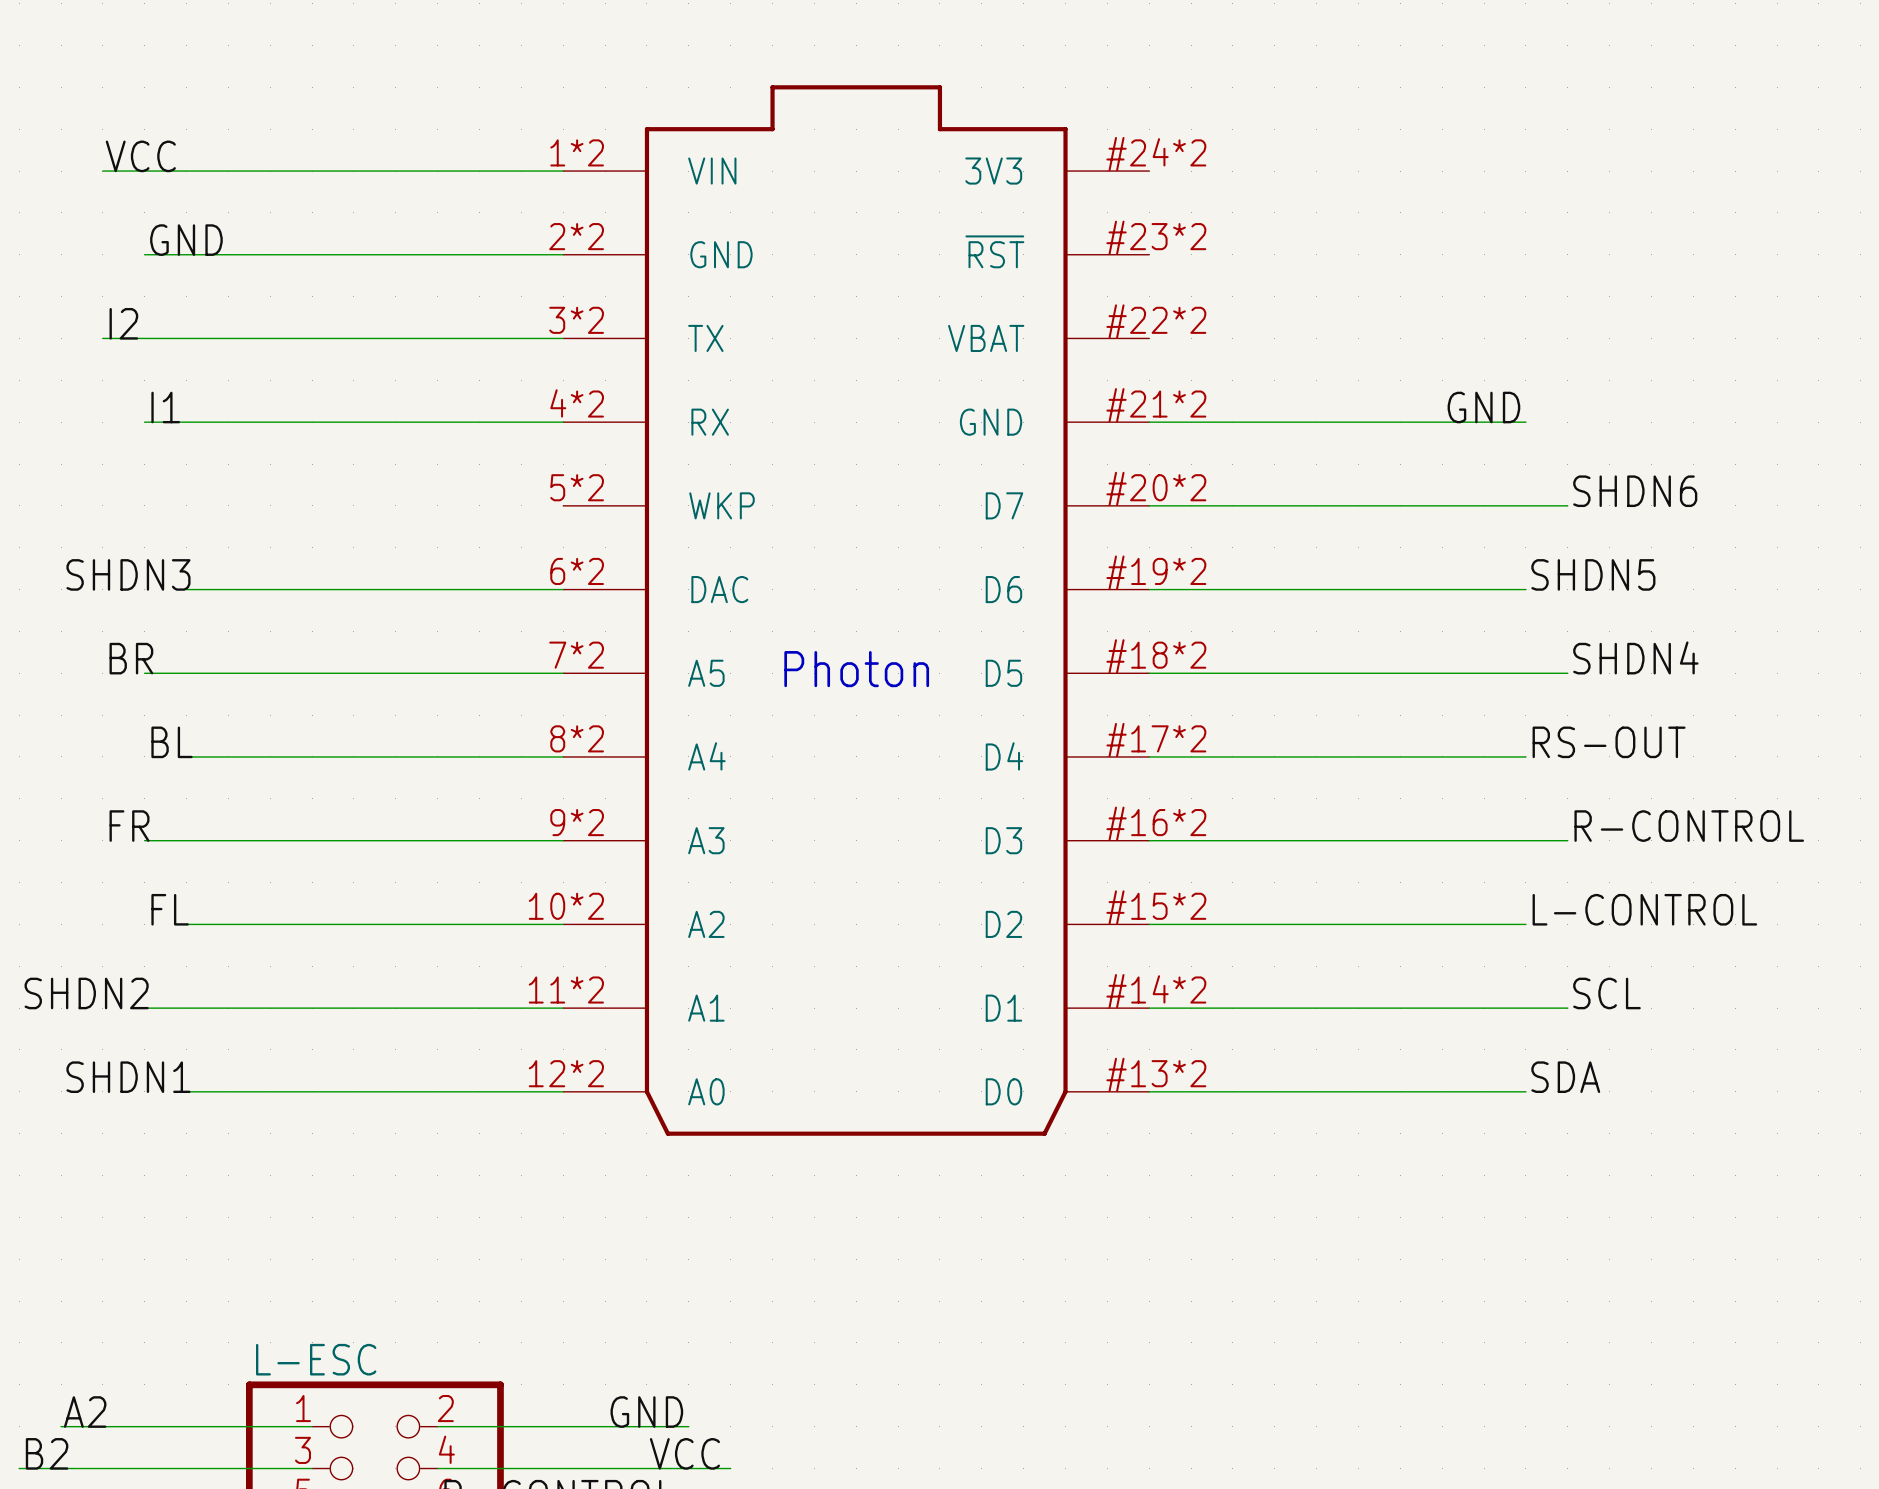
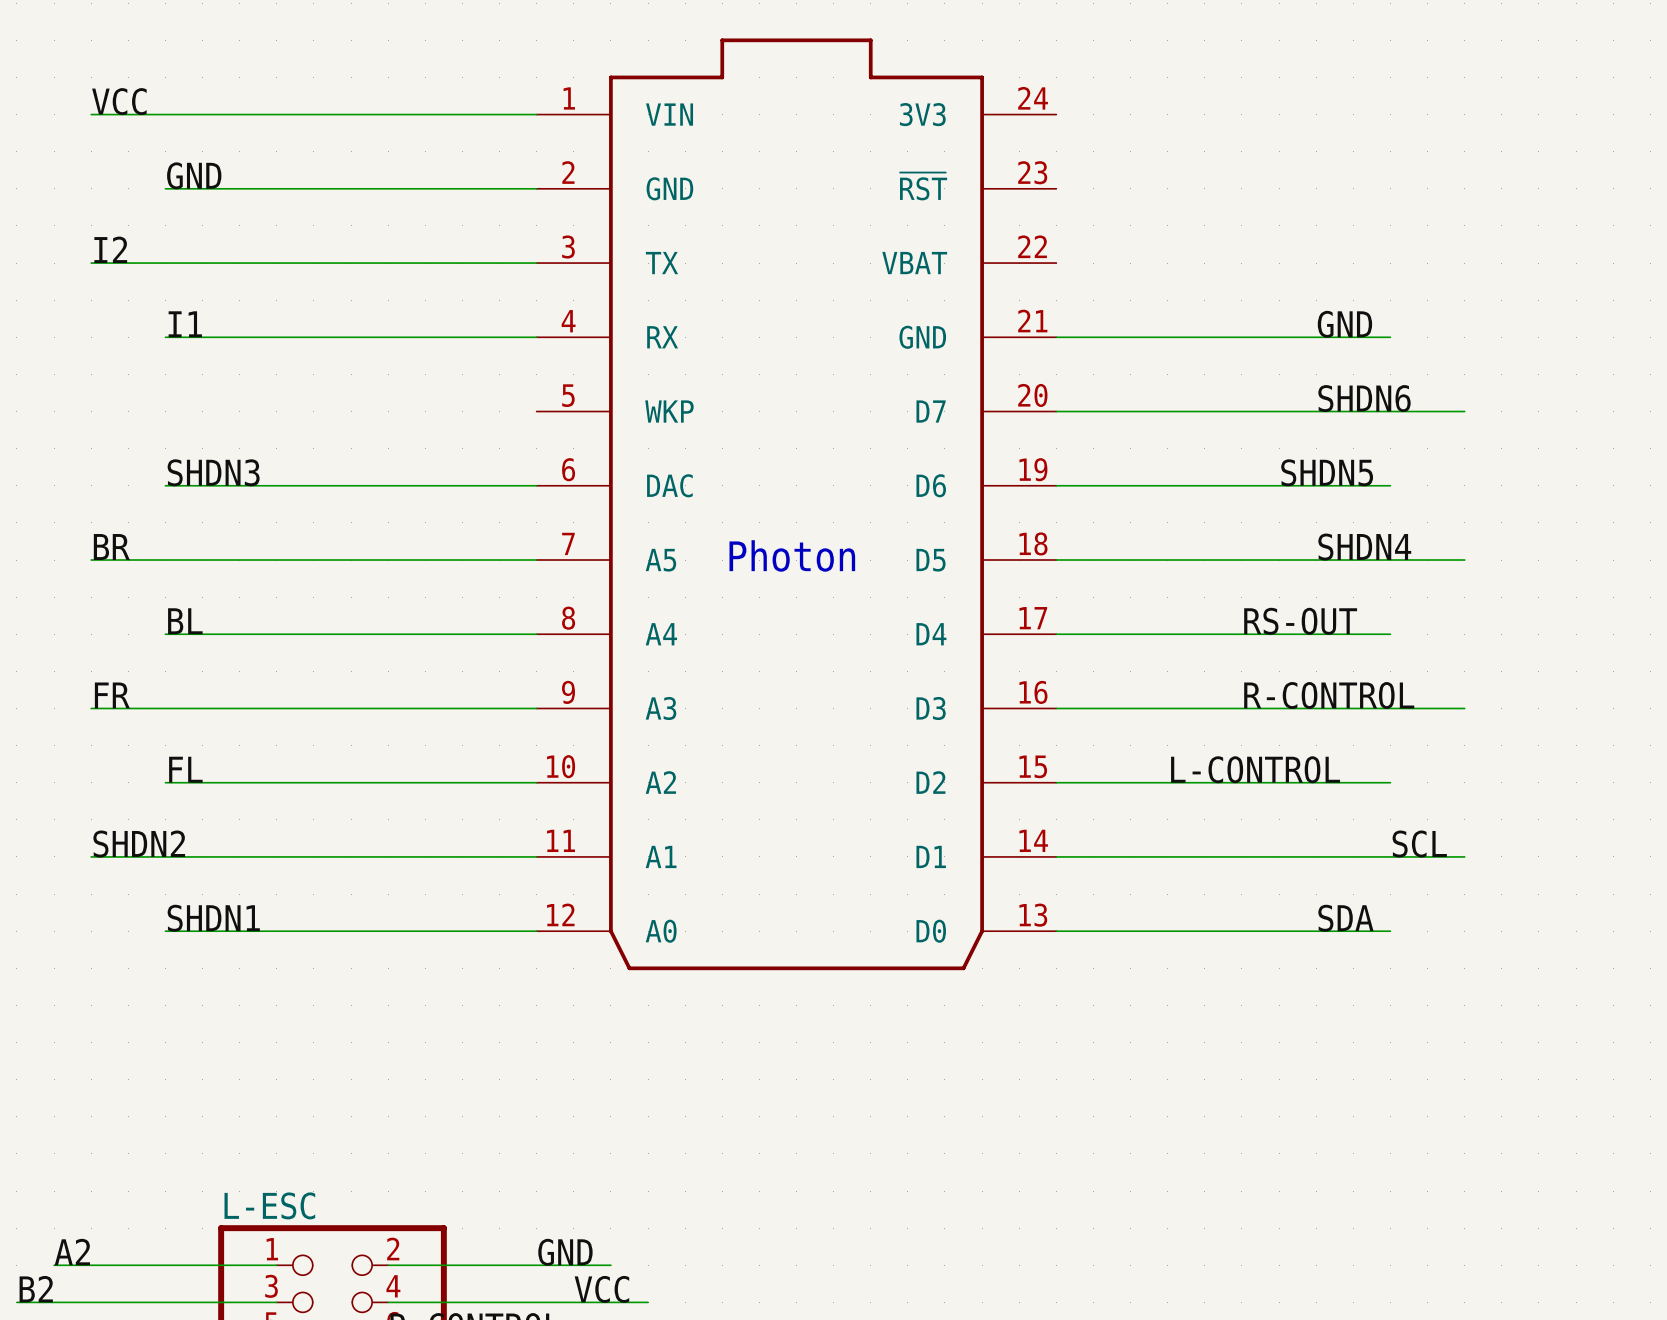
wire: none -> (91, 114) (536, 114)
label position: VCC (140, 156) -> VCC (119, 101)
wire: (102, 171) (563, 171) -> none
label position: GND (186, 240) -> GND (194, 175)
wire: (144, 254) (563, 254) -> (165, 188) (536, 188)
wire: none -> (91, 263) (536, 263)
label position: I2 (123, 323) -> I2 (110, 249)
wire: (102, 338) (563, 338) -> none
label position: I1 (165, 407) -> I1 (185, 324)
label position: GND (1483, 407) -> GND (1344, 324)
wire: (144, 422) (563, 422) -> (165, 337) (536, 337)
wire: (1149, 422) (1525, 422) -> (1056, 337) (1390, 337)
wire: none -> (1056, 411) (1464, 411)
label position: SHDN6 (1635, 491) -> SHDN6 (1364, 398)
wire: (1149, 505) (1567, 505) -> none
wire: none -> (165, 485) (536, 485)
part: none -> (796, 504)
label position: SHDN3 (128, 574) -> SHDN3 (213, 472)
label position: SHDN5 (1593, 574) -> SHDN5 (1327, 472)
wire: (186, 589) (563, 589) -> none
wire: (1149, 589) (1525, 589) -> (1056, 485) (1390, 485)
part: (856, 610) -> none
wire: none -> (91, 560) (536, 560)
wire: none -> (1056, 560) (1464, 560)
label position: SHDN4 (1635, 657) -> SHDN4 (1364, 547)
label position: BR (131, 658) -> BR (111, 547)
wire: (144, 673) (563, 673) -> (165, 634) (536, 634)
wire: (1149, 673) (1567, 673) -> none
label position: BL (172, 742) -> BL (185, 621)
label position: RS-OUT (1609, 742) -> RS-OUT (1300, 621)
wire: (186, 756) (563, 756) -> none
wire: (1149, 756) (1525, 756) -> (1056, 634) (1390, 634)
wire: none -> (91, 708) (536, 708)
wire: none -> (1056, 708) (1464, 708)
label position: FR (129, 826) -> FR (112, 695)
label position: R-CONTROL (1689, 826) -> R-CONTROL (1329, 695)
wire: (144, 840) (563, 840) -> (165, 782) (536, 782)
wire: (1149, 840) (1567, 840) -> none
label position: FL (170, 909) -> FL (185, 769)
label position: L-CONTROL (1644, 909) -> L-CONTROL (1255, 769)
wire: (186, 924) (563, 924) -> none
wire: (1149, 924) (1525, 924) -> (1056, 782) (1390, 782)
wire: none -> (91, 856) (536, 856)
wire: none -> (1056, 856) (1464, 856)
label position: SHDN2 (86, 993) -> SHDN2 (139, 843)
label position: SCL (1606, 993) -> SCL (1419, 843)
wire: (144, 1008) (563, 1008) -> (165, 931) (536, 931)
wire: (1149, 1008) (1567, 1008) -> none
label position: SHDN1 (128, 1077) -> SHDN1 (213, 918)
label position: SDA (1565, 1077) -> SDA (1345, 918)
wire: (186, 1091) (563, 1091) -> none
wire: (1149, 1091) (1525, 1091) -> (1056, 931) (1390, 931)

